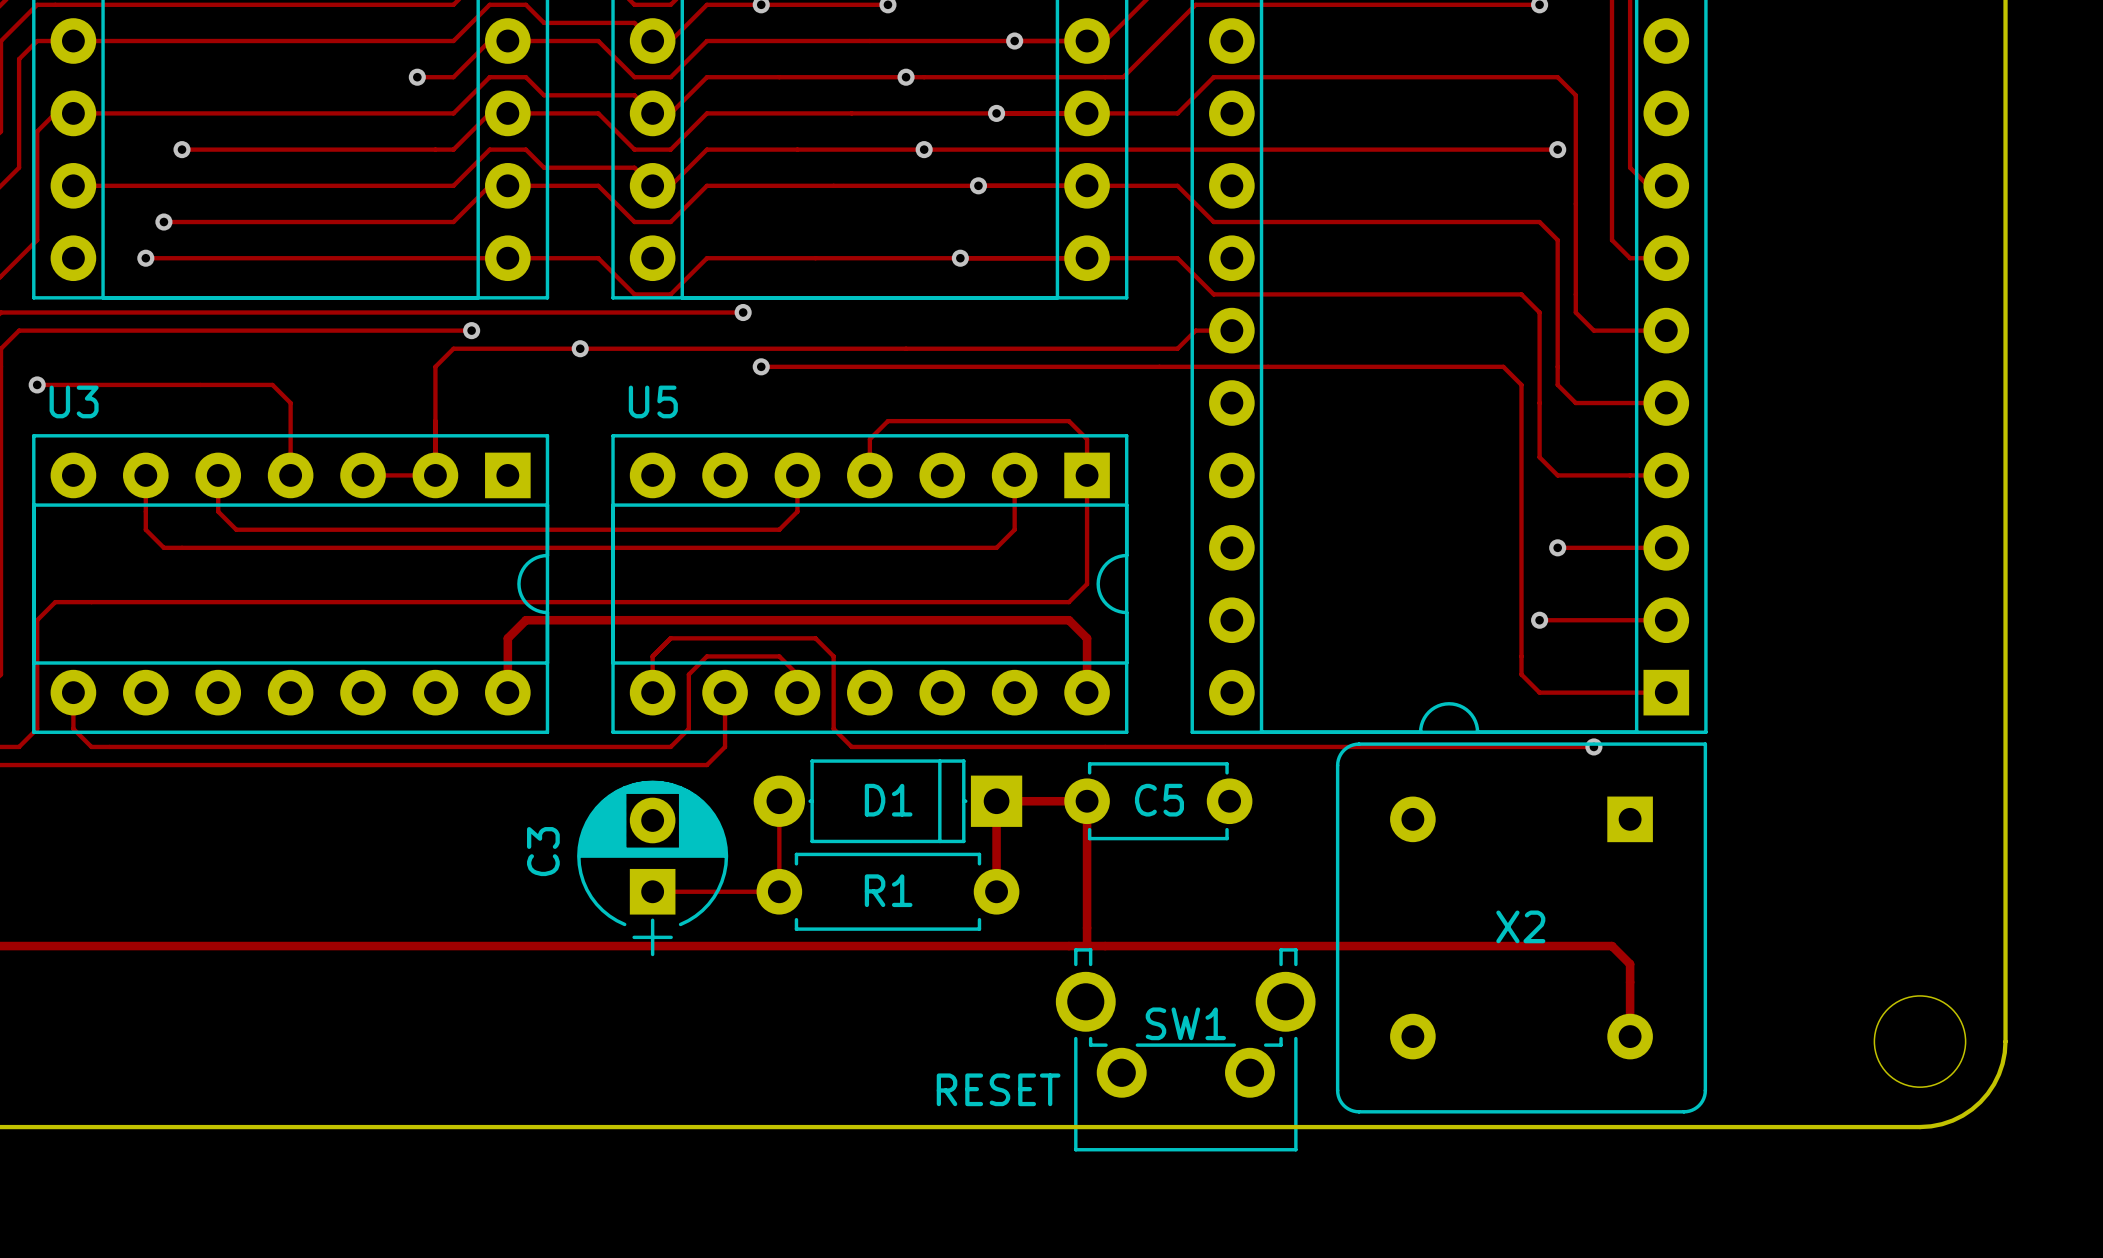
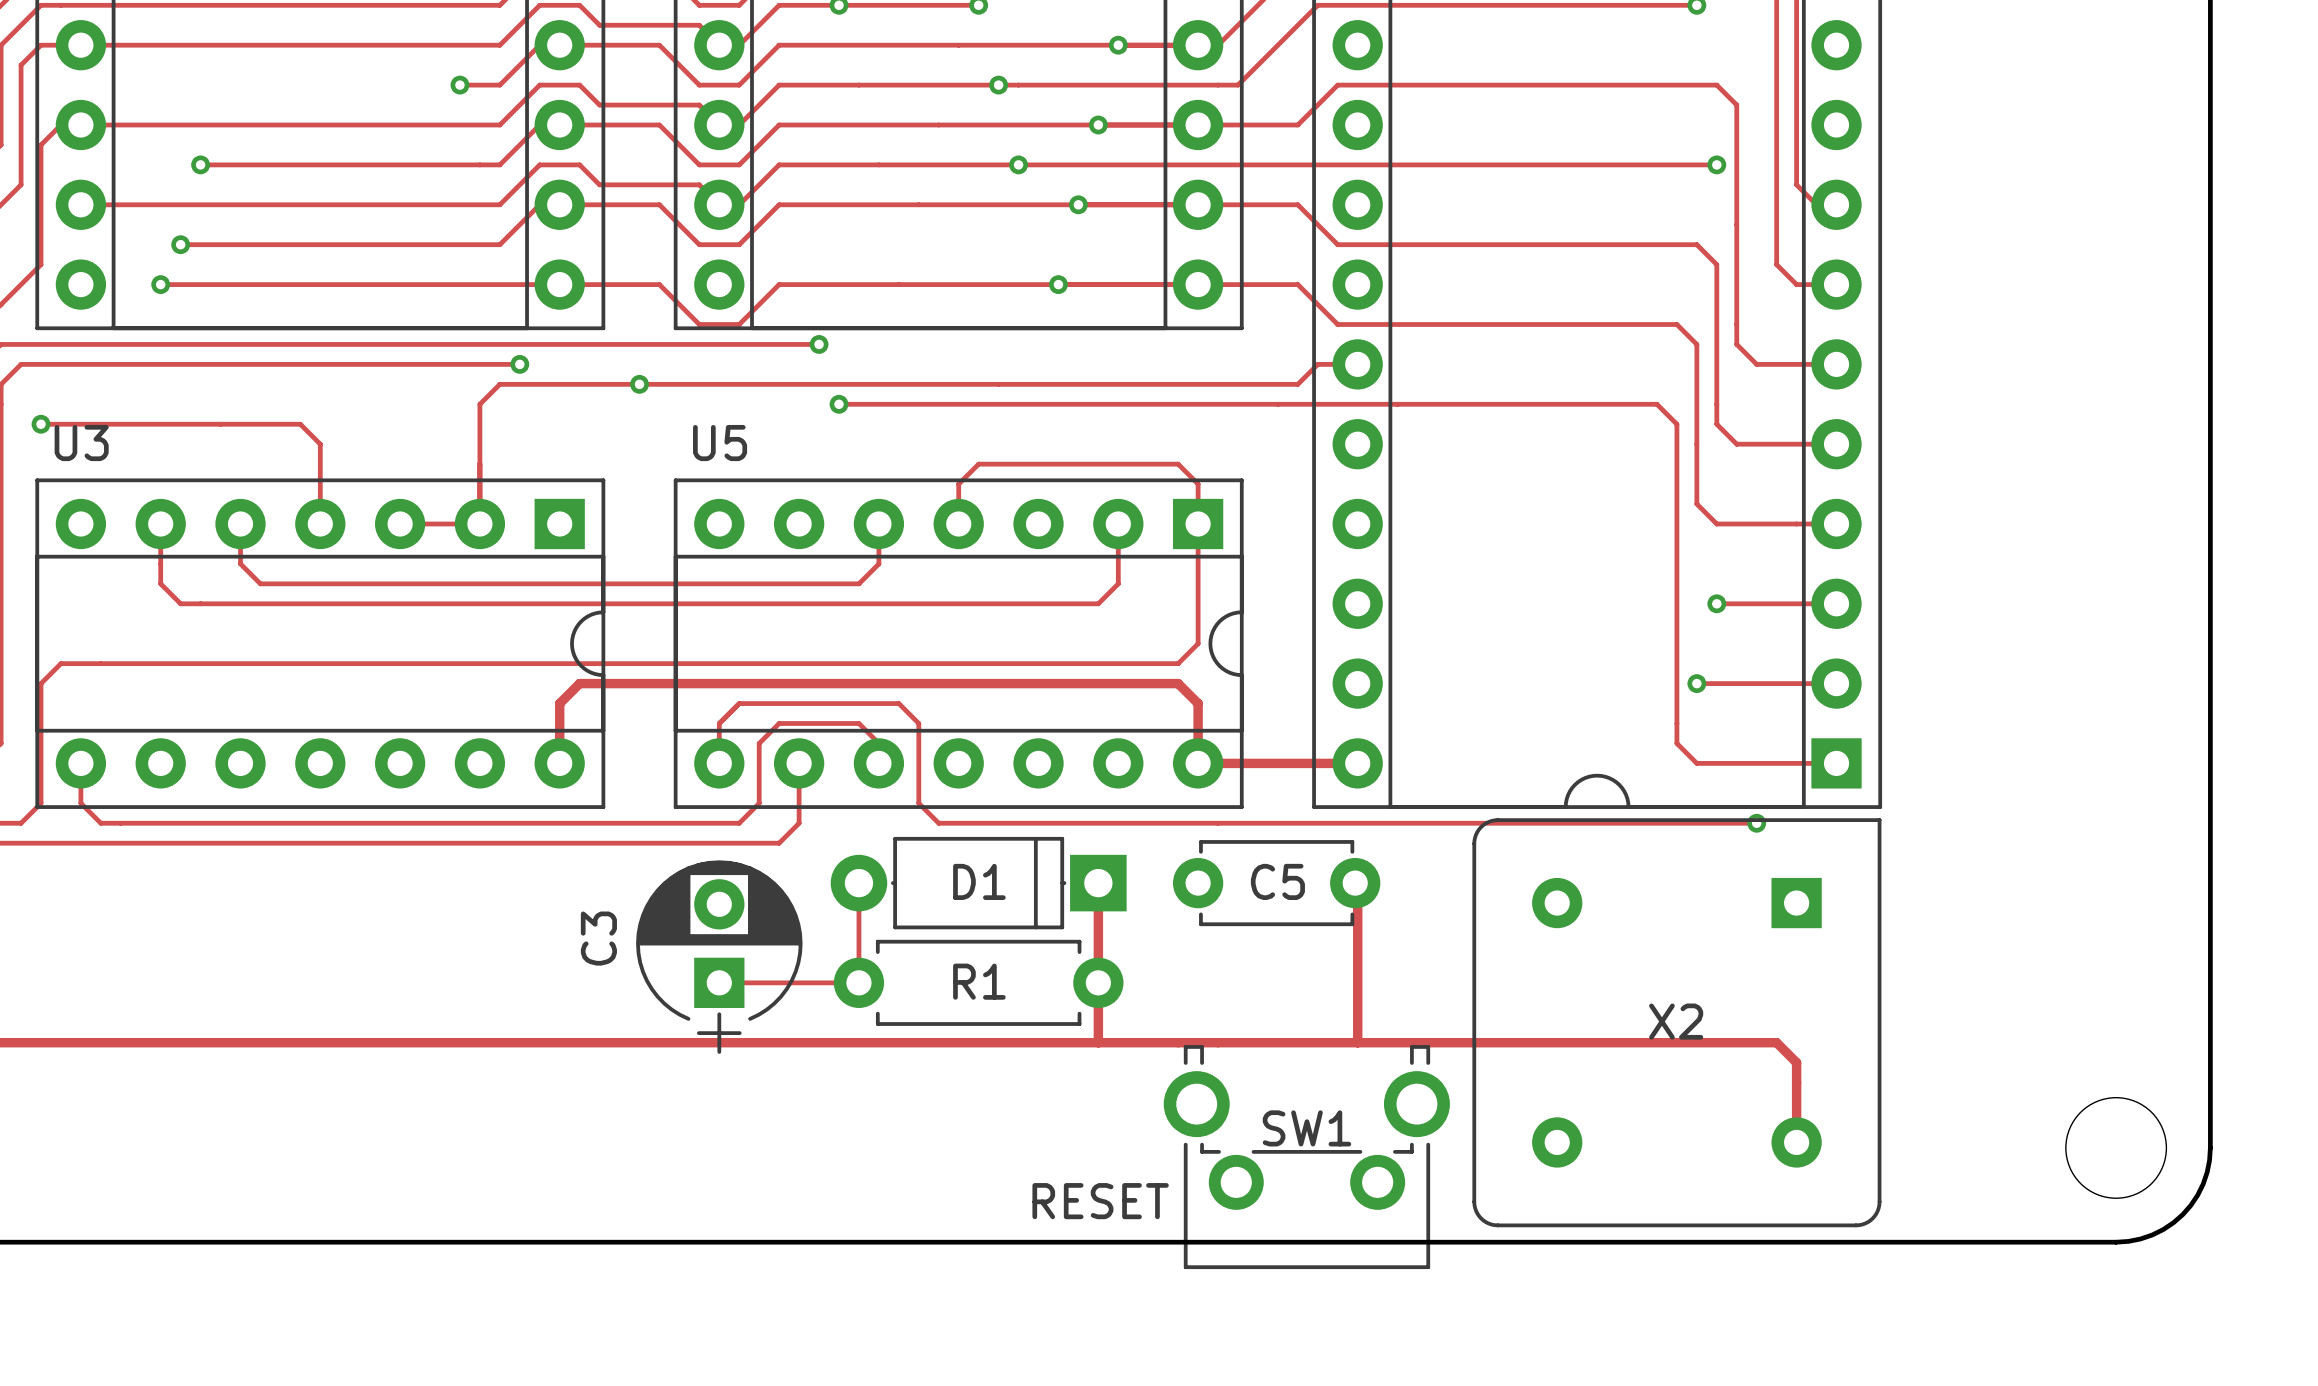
track: none -> (1198, 763) (1357, 763)
track: (996, 801) (1087, 801) (1087, 946) -> none
track: none -> (1357, 883) (1357, 1042)
track: none -> (1098, 982) (1098, 1042)

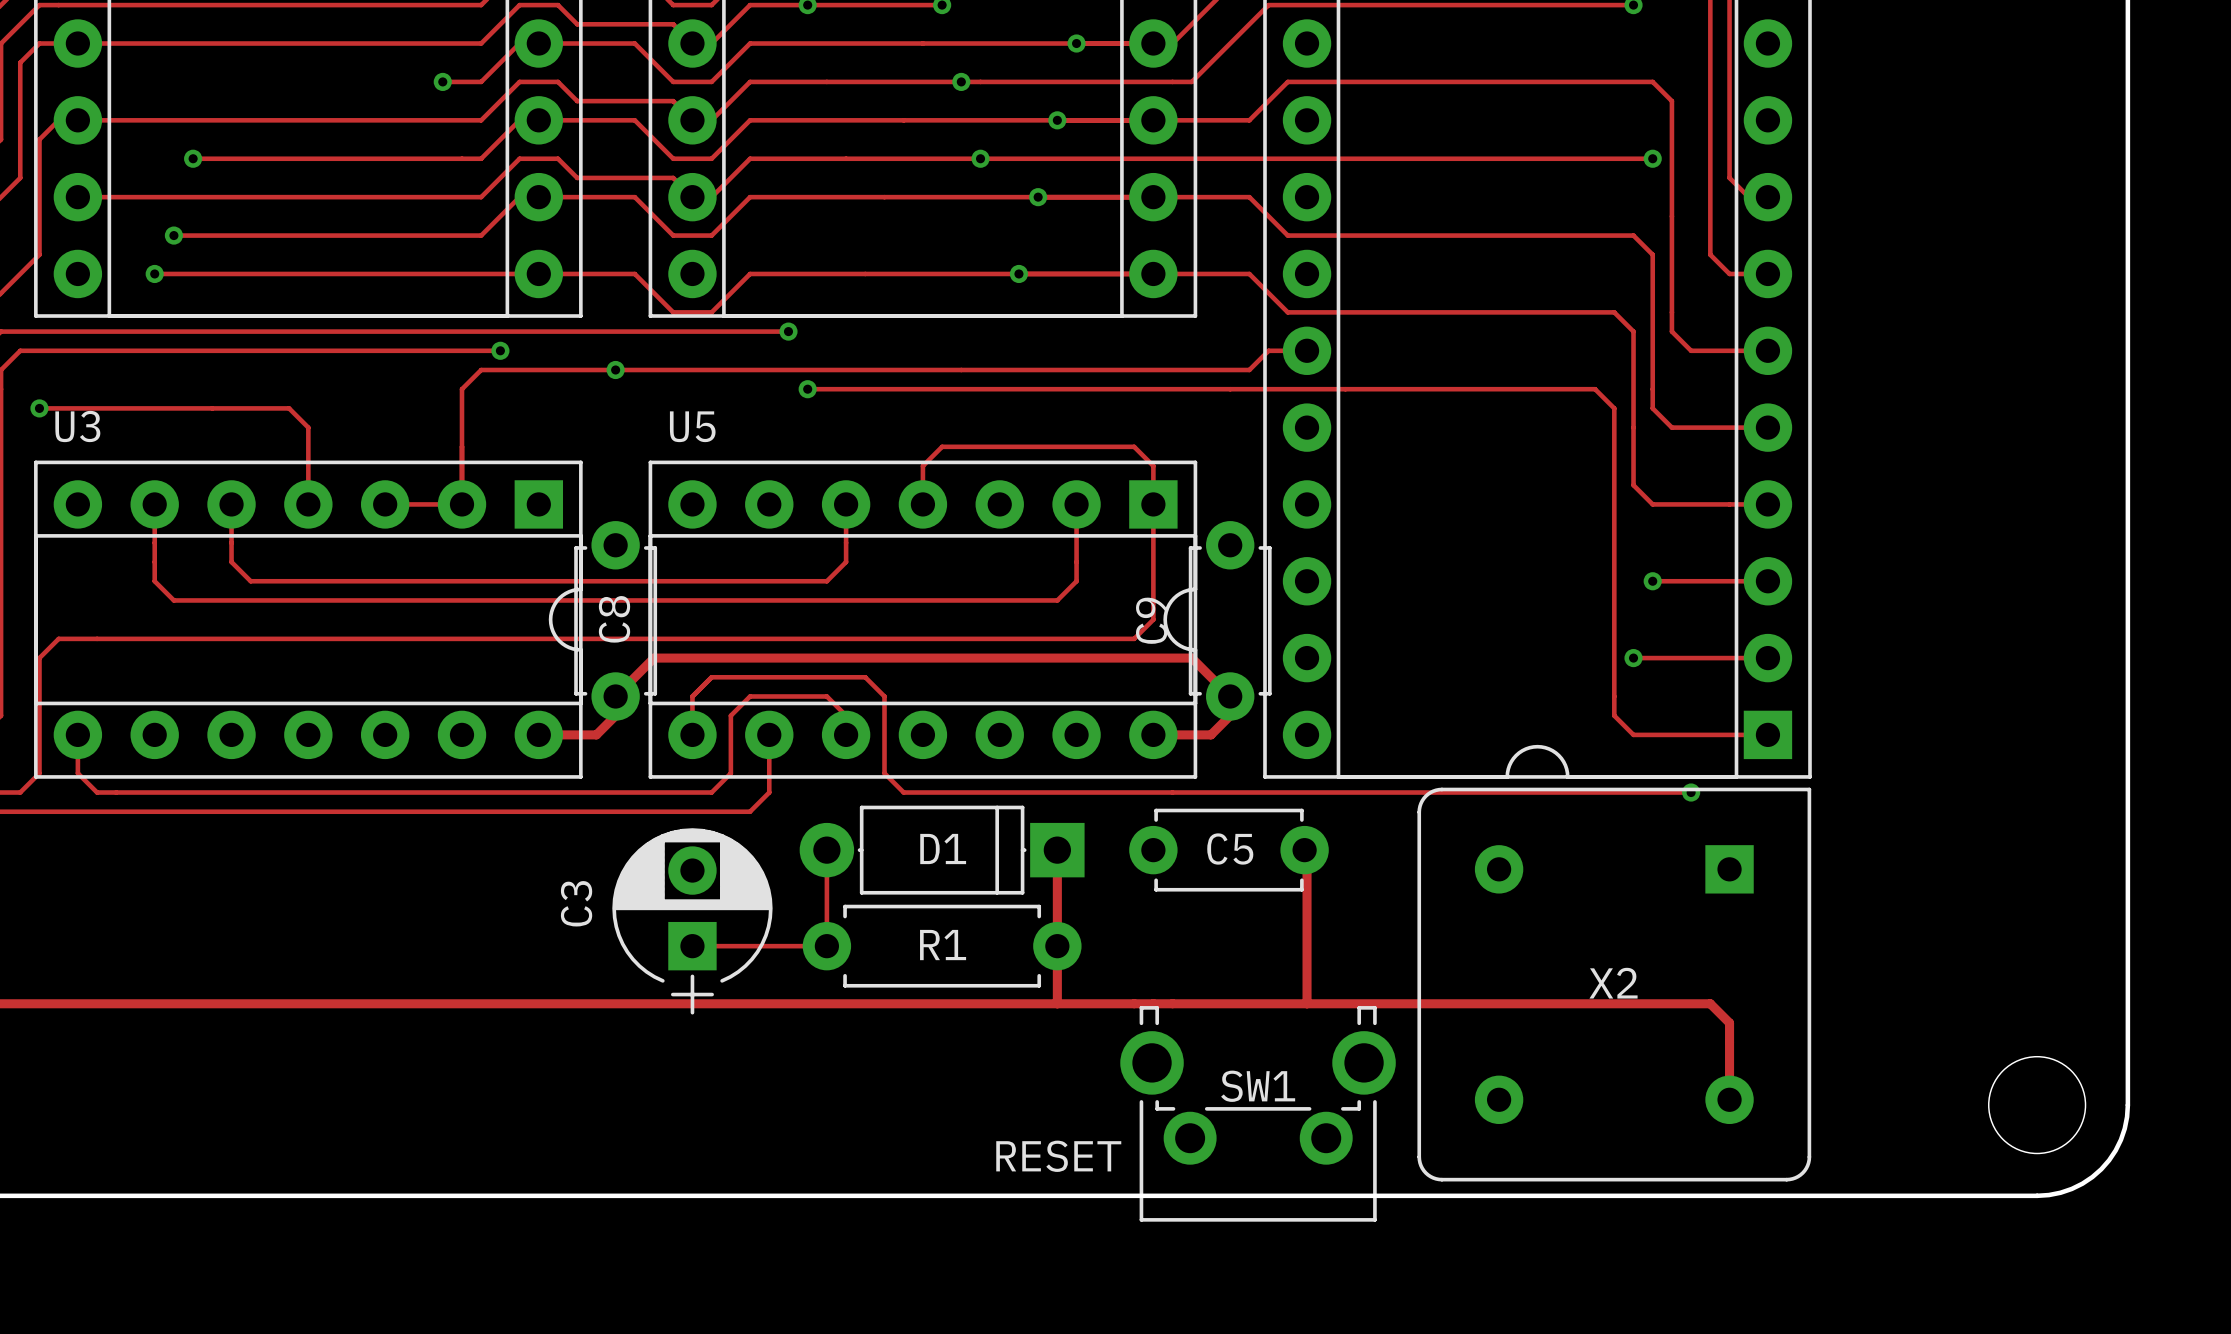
track: (240, 563) (260, 583) (858, 583) (878, 563) -> none
track: (160, 583) (180, 603) (260, 603) -> (231, 542) (231, 562) (250, 581)
track: none -> (154, 562) (154, 581) (173, 600) (1057, 600) (1076, 581) (1076, 562)
track: (1118, 583) (1098, 603) (858, 603) -> (846, 542) (846, 562) (826, 581)
C8: none -> (615, 620)
C9: none -> (1230, 620)
track: (679, 683) (579, 683) (559, 703) (559, 763) -> (654, 658) (615, 696) (615, 715) (596, 734) (538, 734)
track: (1178, 683) (1198, 703) (1198, 763) -> (1134, 658) (1191, 658) (1230, 696) (1230, 715) (1211, 734)
track: (1257, 763) (1357, 763) -> none

